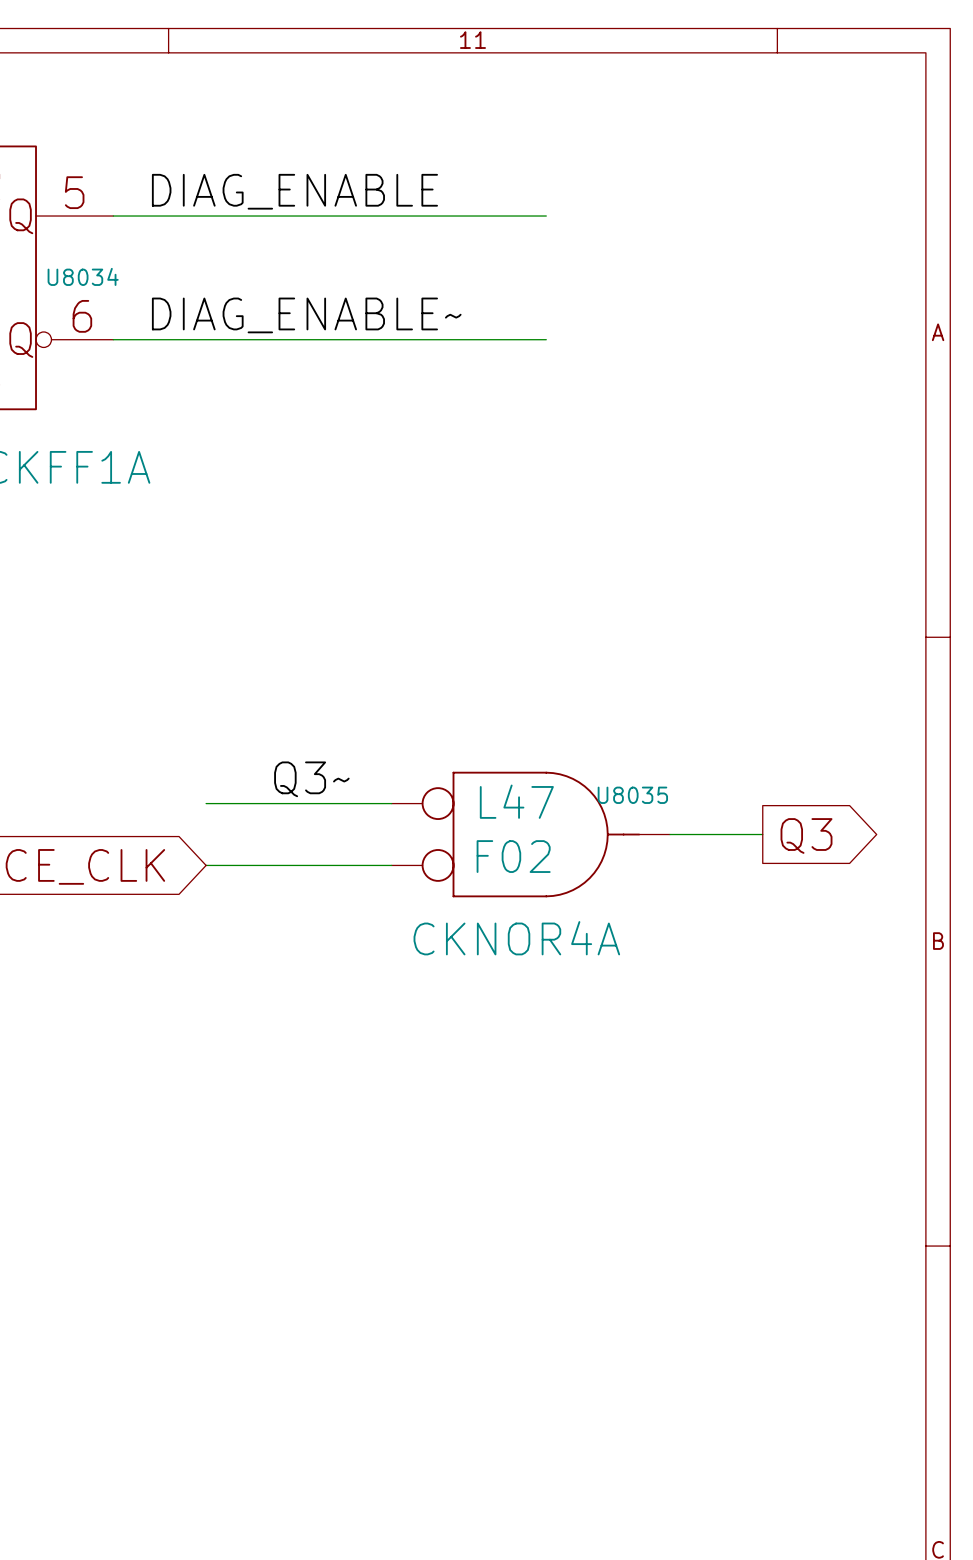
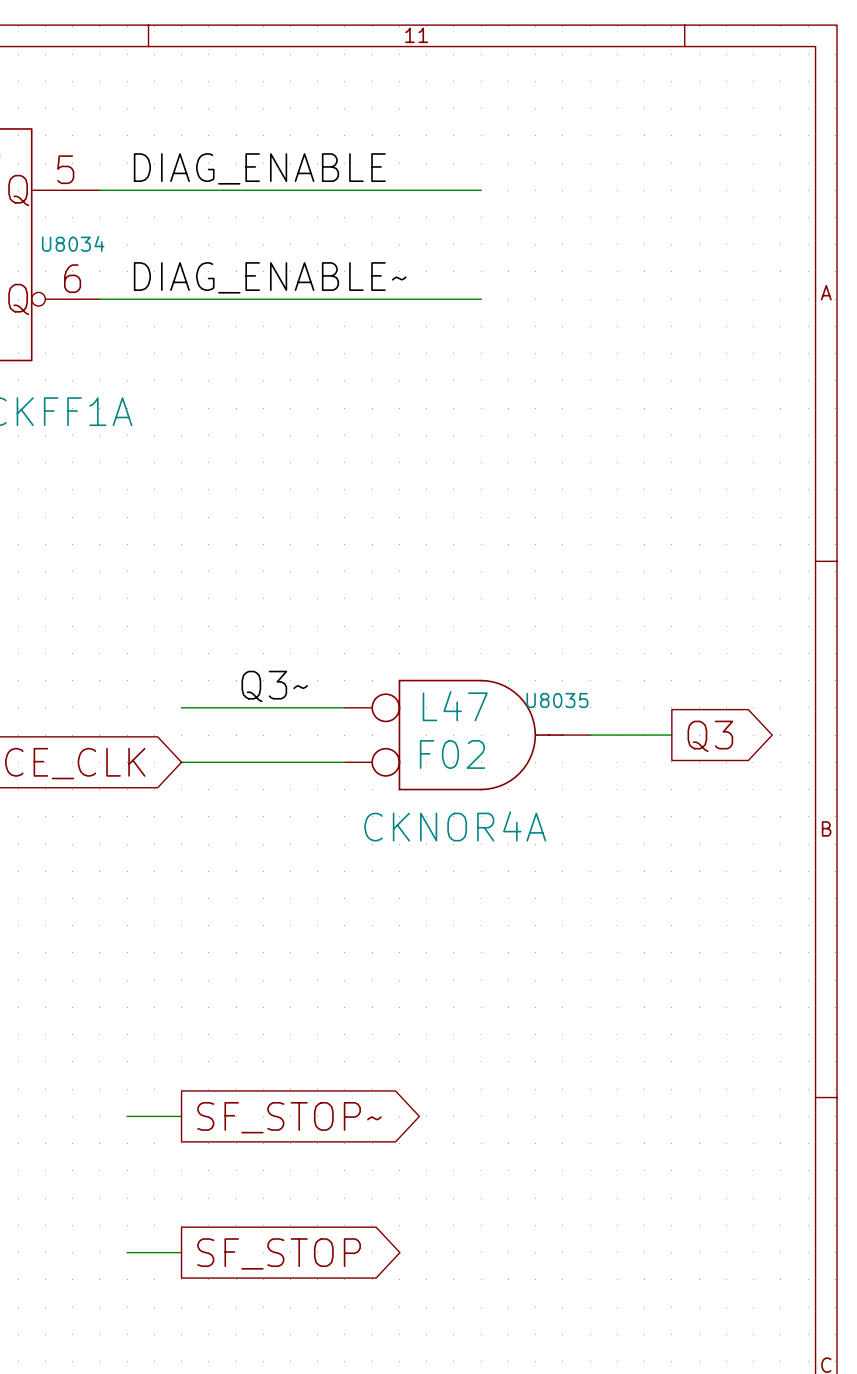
wire: none -> (127, 1116) (181, 1116)
global label: none -> SF_STOP~ (289, 1117)
wire: none -> (127, 1252) (181, 1252)
global label: none -> SF_STOP (279, 1253)

